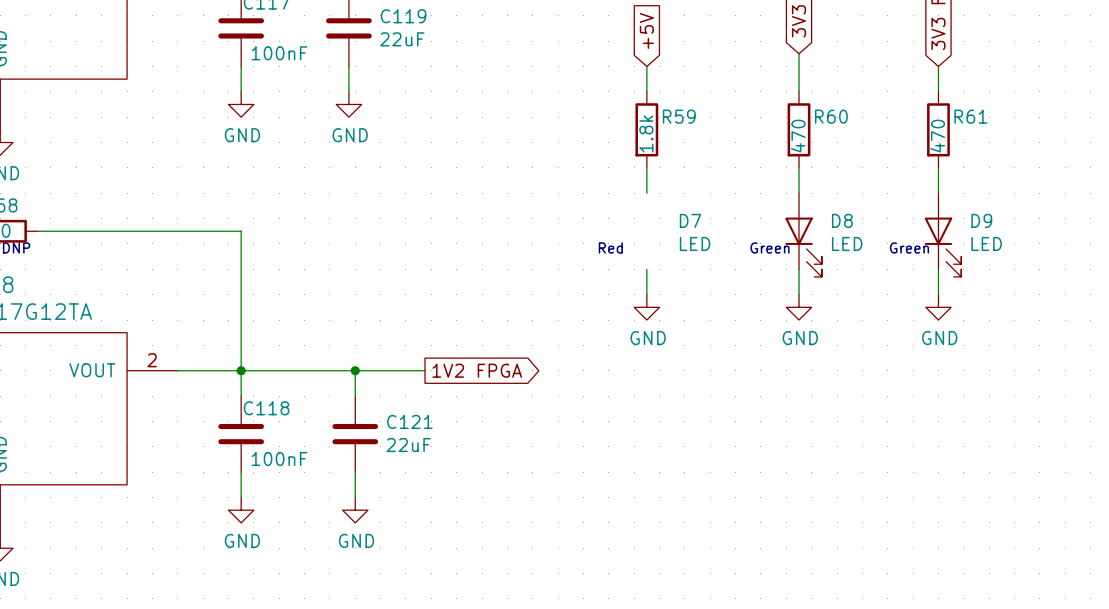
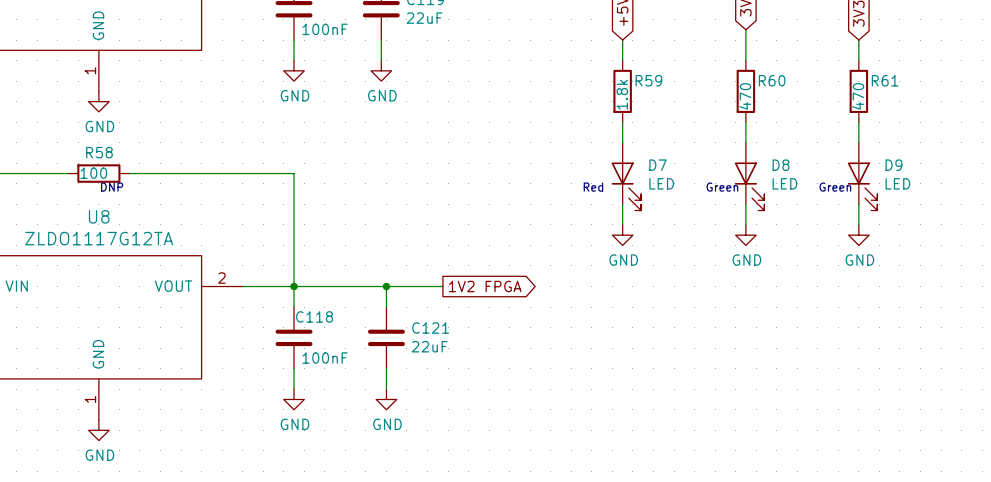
D7 symbol: [679, 213, 711, 252] -> [611, 142, 642, 211]

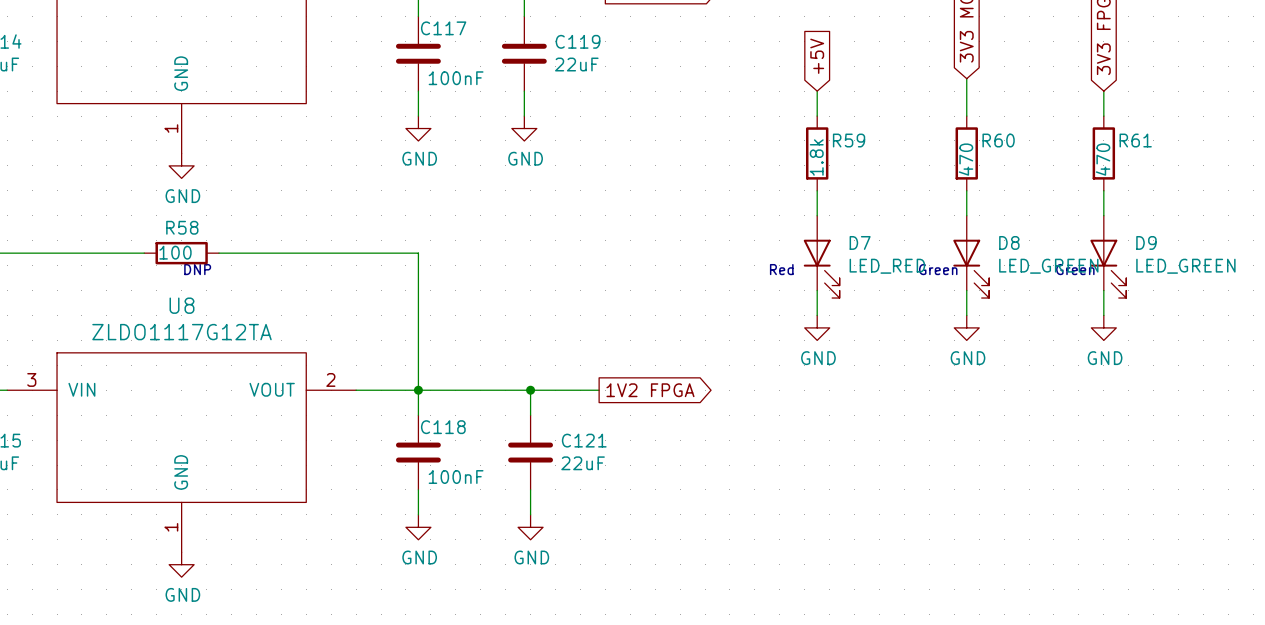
D7 value: LED (661, 183) -> LED_RED (887, 266)
D8 value: LED (784, 183) -> LED_GREEN (1048, 266)
D9 value: LED (897, 183) -> LED_GREEN (1185, 266)

